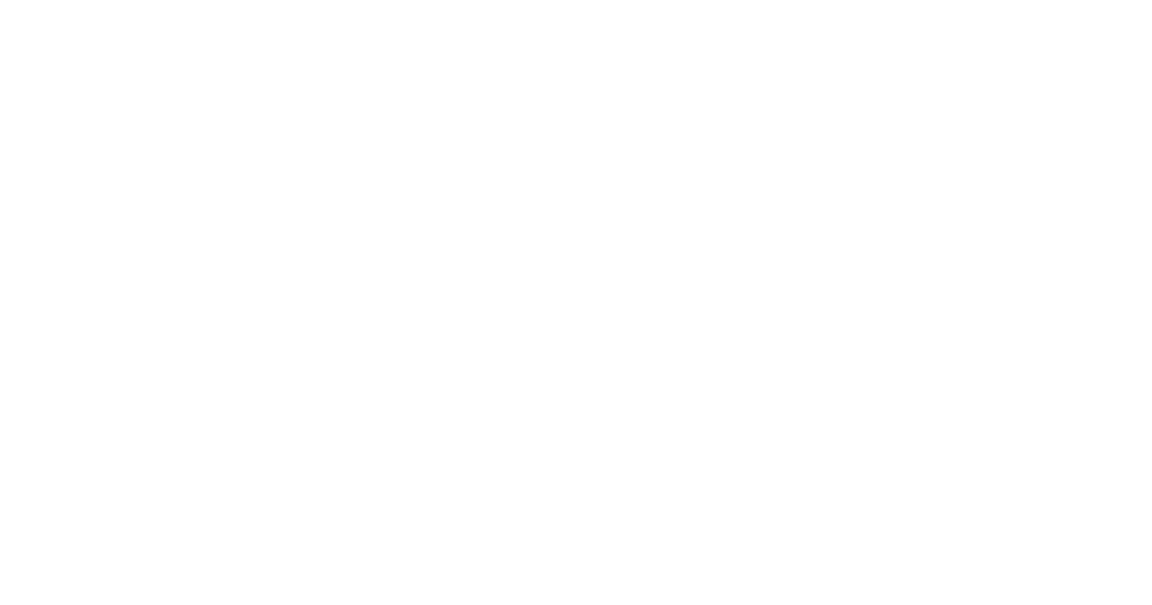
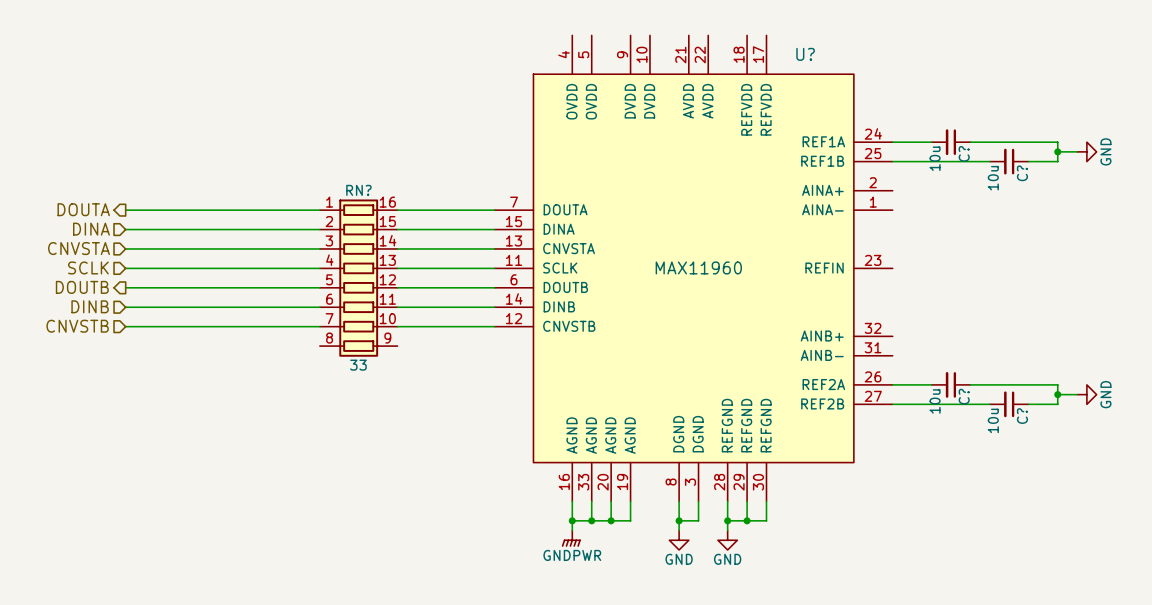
wire: none -> (892, 142) (931, 142)
C?: none -> 10u (950, 142)
wire: none -> (970, 142) (1057, 142) (1057, 161) (1028, 161)
wire: none -> (1057, 151) (1077, 151)
junction: none -> (1057, 151)
power symbol: none -> GND (1086, 151)
wire: none -> (892, 161) (989, 161)
C?: none -> 10u (1009, 161)
hierarchical label: none -> DOUTA (83, 209)
wire: none -> (125, 210) (319, 210)
wire: none -> (397, 210) (494, 210)
hierarchical label: none -> DINA (91, 229)
wire: none -> (125, 229) (319, 229)
wire: none -> (397, 229) (494, 229)
hierarchical label: none -> CNVSTA (78, 248)
wire: none -> (125, 248) (319, 248)
wire: none -> (397, 248) (494, 248)
hierarchical label: none -> SCLK (88, 267)
wire: none -> (125, 268) (319, 268)
wire: none -> (397, 268) (494, 268)
U?: none -> MAX11960 (693, 268)
RN?: none -> 33 (358, 278)
hierarchical label: none -> DOUTB (82, 287)
wire: none -> (125, 287) (319, 287)
wire: none -> (397, 287) (494, 287)
hierarchical label: none -> DINB (90, 306)
wire: none -> (125, 307) (319, 307)
wire: none -> (397, 307) (494, 307)
hierarchical label: none -> CNVSTB (77, 326)
wire: none -> (125, 326) (319, 326)
wire: none -> (397, 326) (494, 326)
wire: none -> (892, 384) (931, 384)
C?: none -> 10u (950, 384)
wire: none -> (970, 384) (1057, 384) (1057, 404) (1028, 404)
wire: none -> (1057, 394) (1077, 394)
junction: none -> (1057, 394)
power symbol: none -> GND (1086, 394)
wire: none -> (892, 404) (989, 404)
C?: none -> 10u (1009, 404)
wire: none -> (572, 501) (572, 530)
wire: none -> (591, 501) (591, 520)
wire: none -> (611, 501) (611, 520)
wire: none -> (630, 501) (630, 520) (572, 520)
wire: none -> (679, 501) (679, 530)
wire: none -> (698, 501) (698, 520) (679, 520)
wire: none -> (727, 501) (727, 530)
wire: none -> (747, 501) (747, 520)
wire: none -> (766, 501) (766, 520) (727, 520)
junction: none -> (572, 520)
junction: none -> (591, 520)
junction: none -> (611, 520)
junction: none -> (679, 520)
junction: none -> (727, 520)
junction: none -> (747, 520)
power symbol: none -> GNDPWR (571, 538)
power symbol: none -> GND (679, 540)
power symbol: none -> GND (727, 540)

